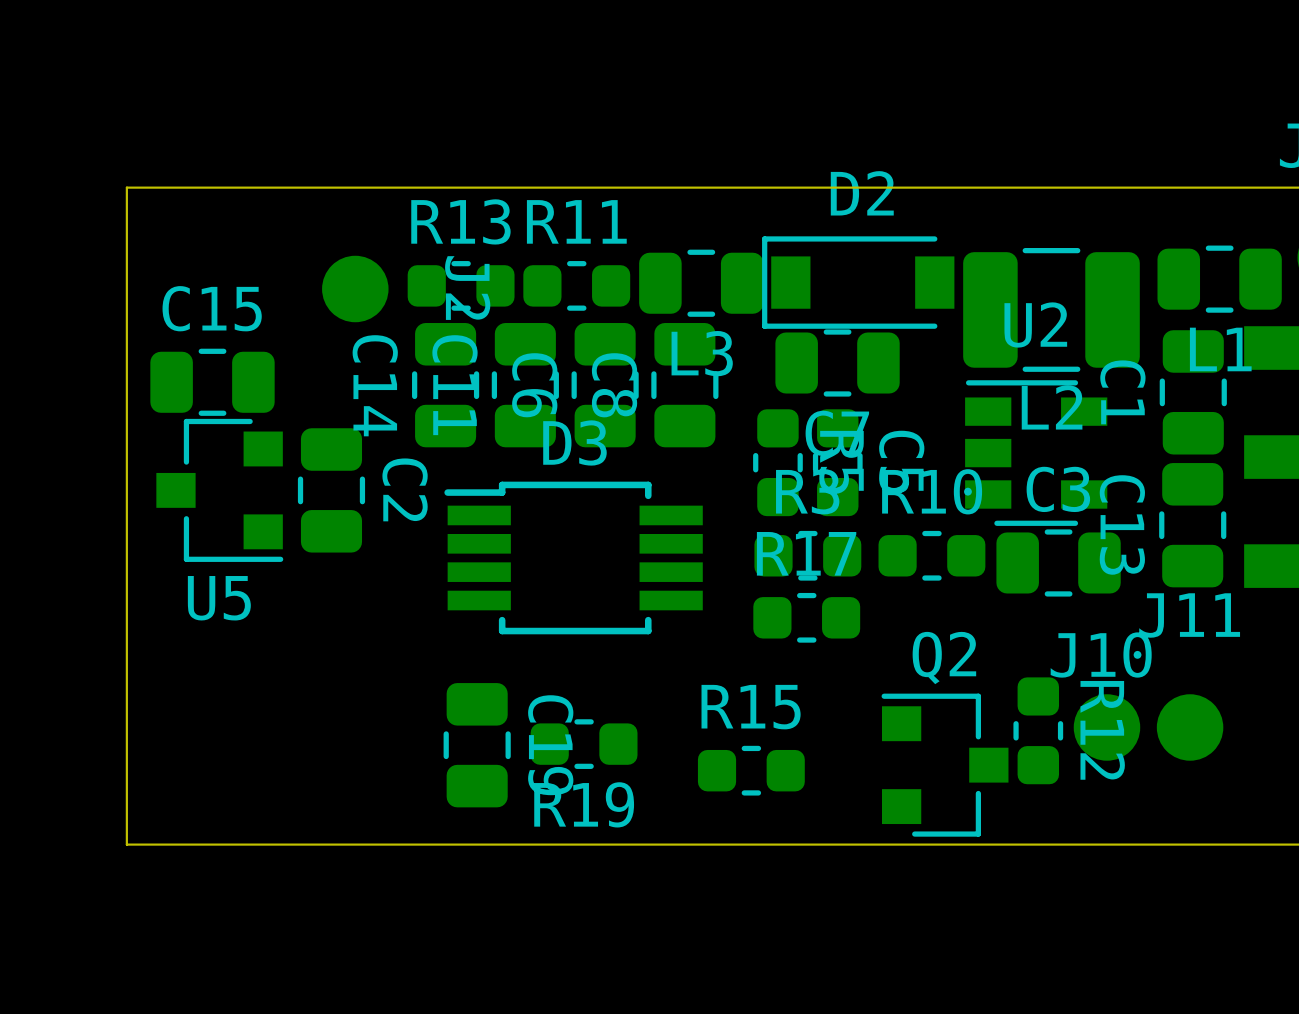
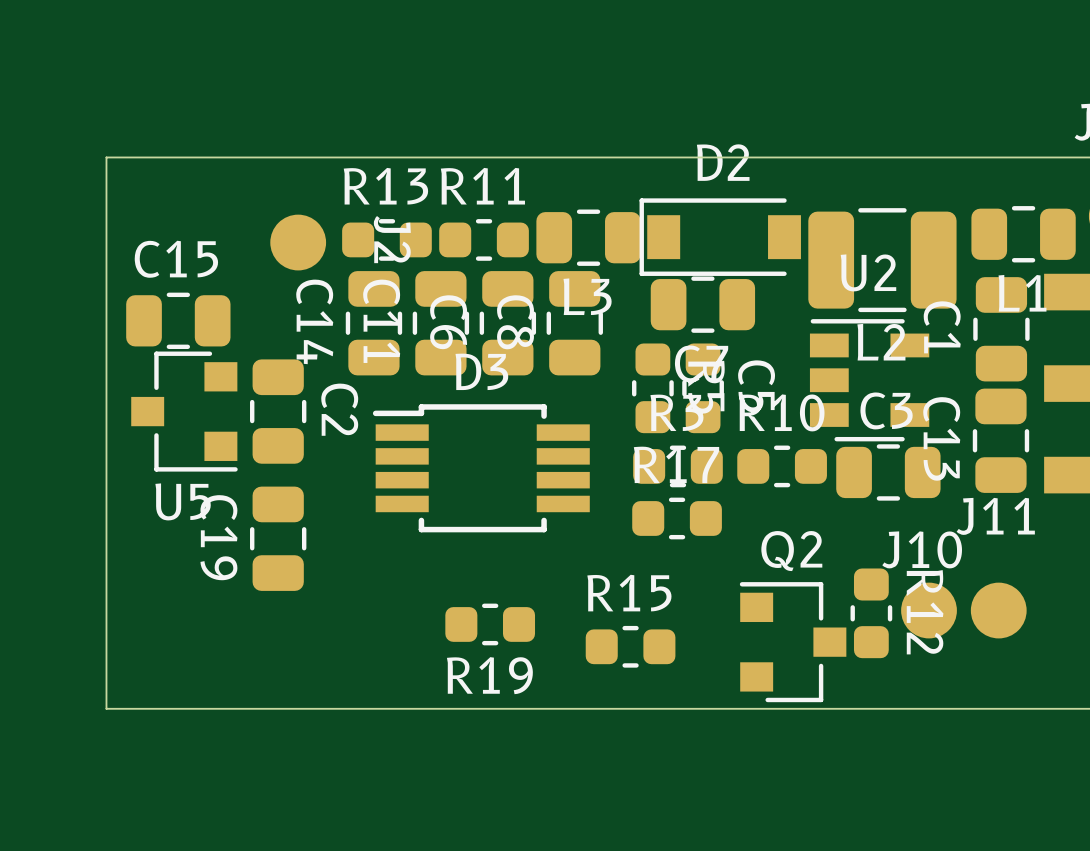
C19 position: (477, 745) -> (278, 538)
C19 name position: C19 (550, 745) -> C19 (218, 537)

